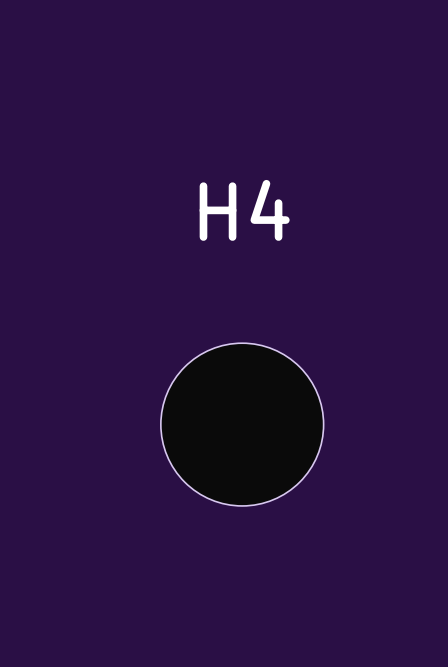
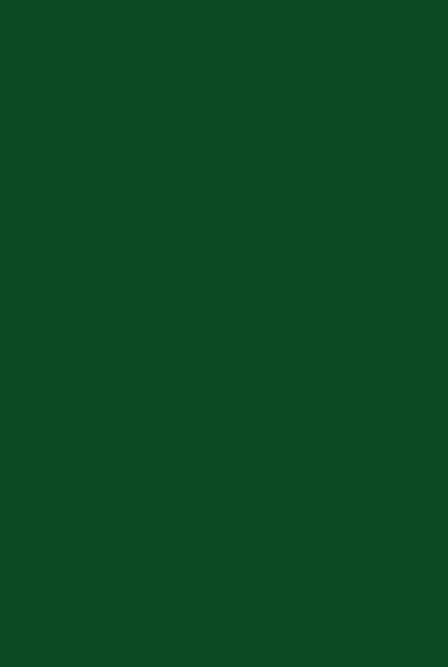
H4: (242, 424) -> none

